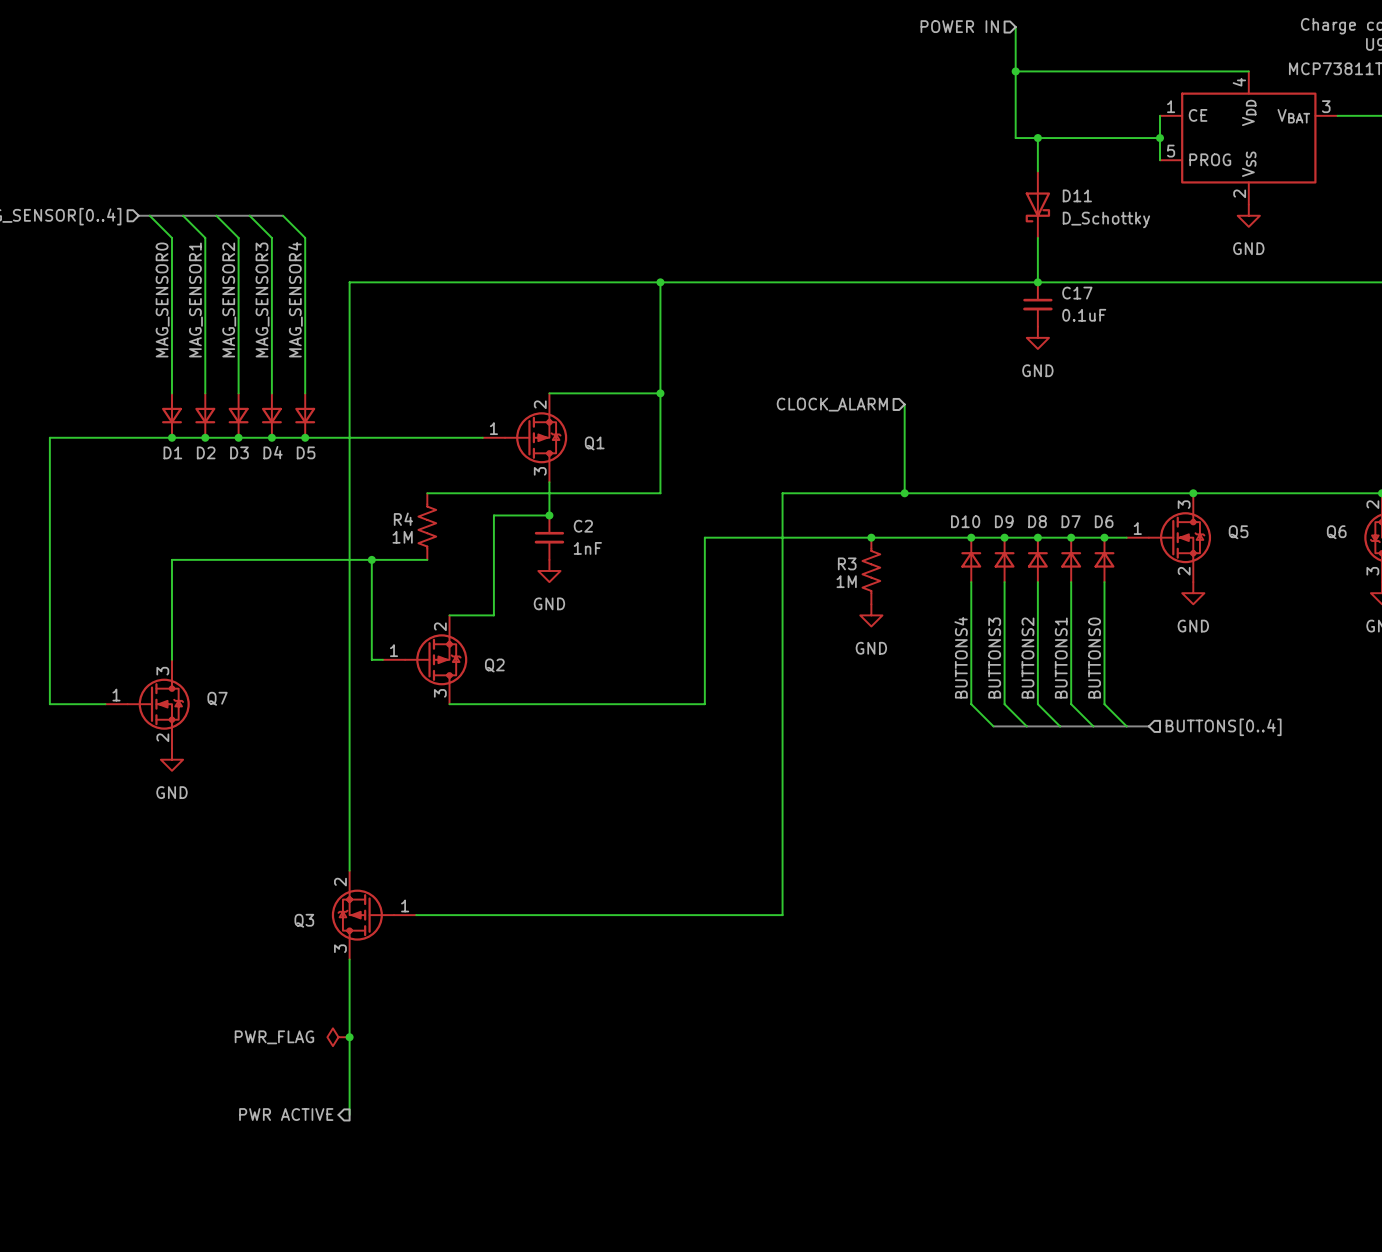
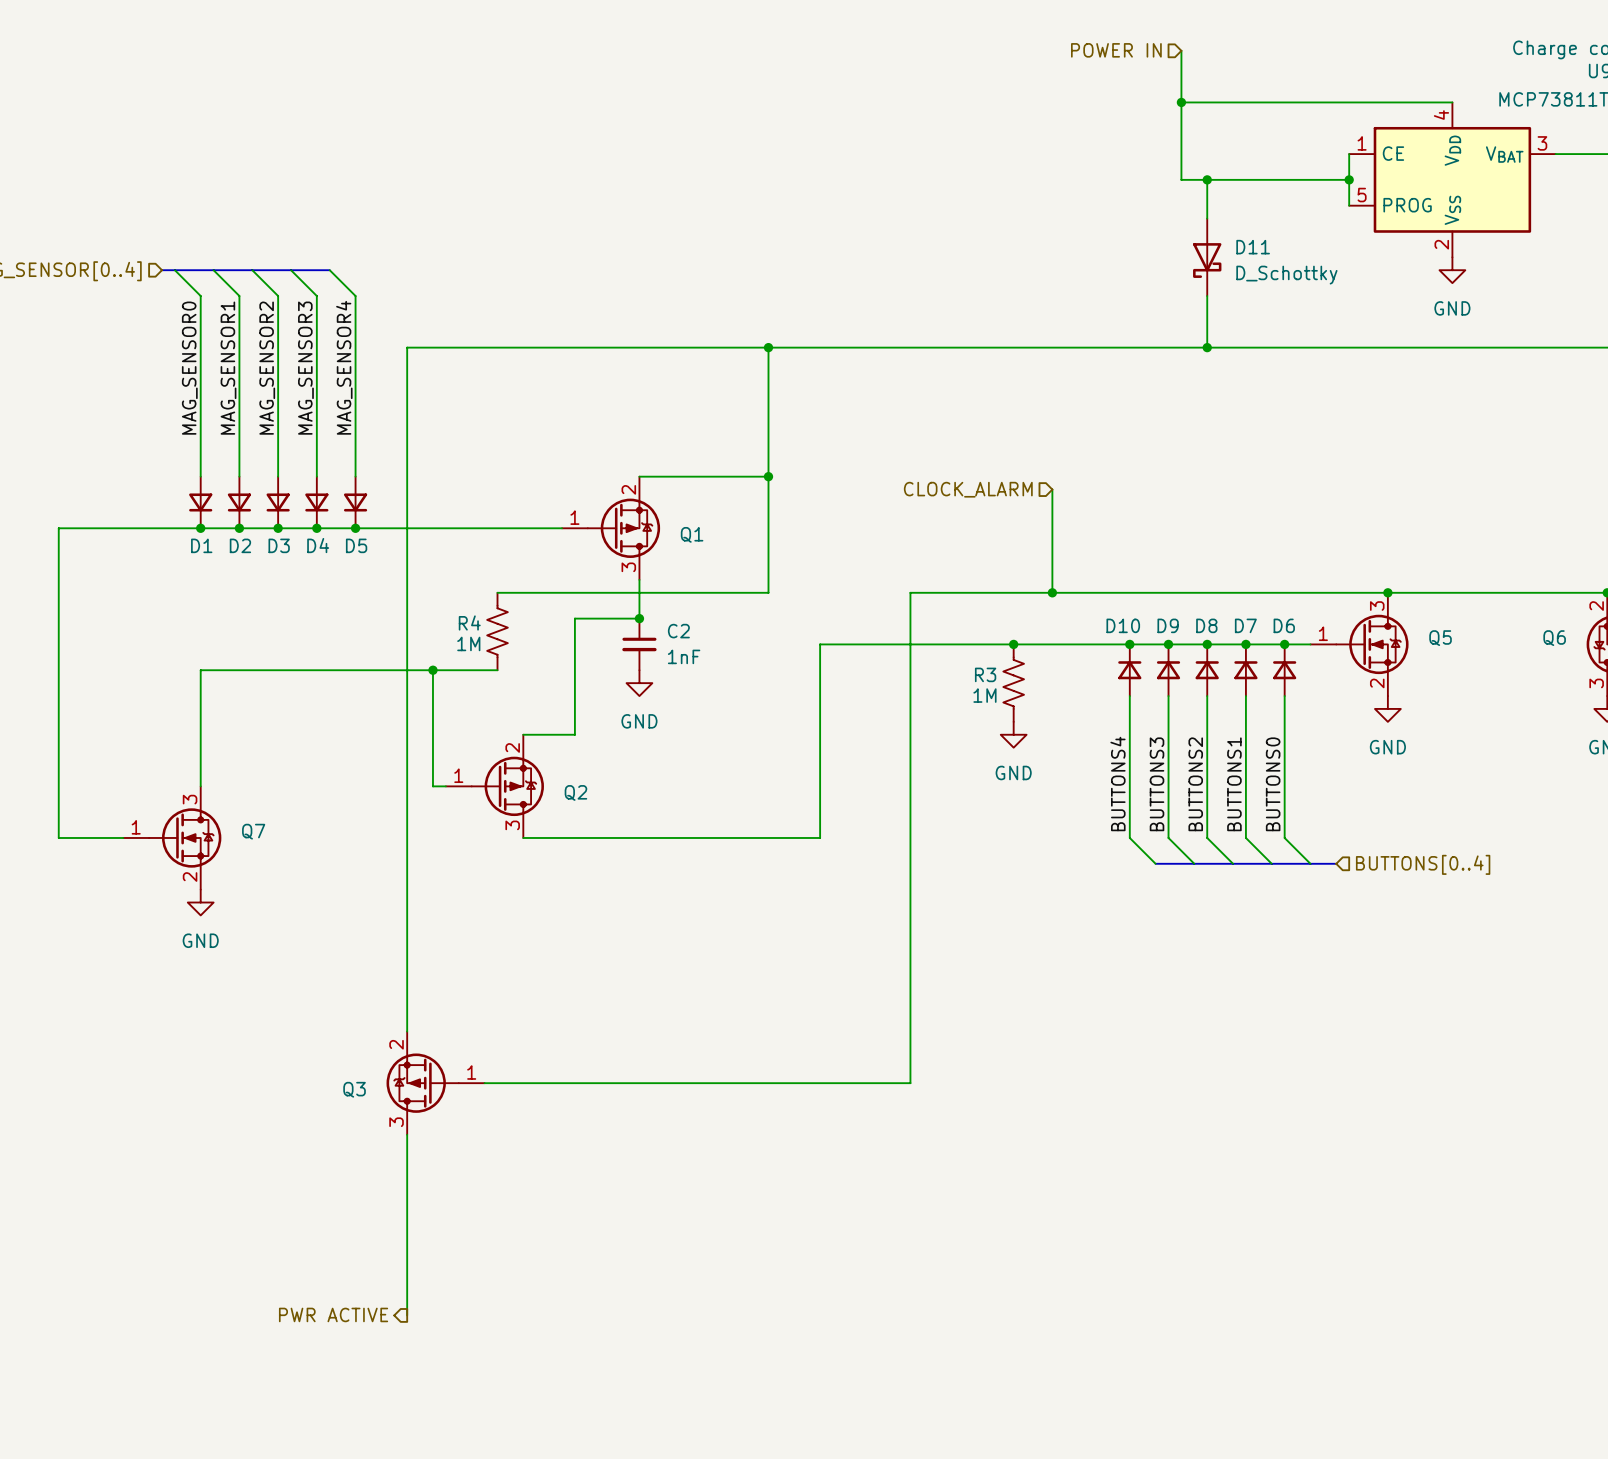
C17: 0.1uF (1037, 304) -> none
power symbol: GND (1037, 337) -> none
power symbol: PWR_FLAG (338, 1037) -> none
junction: (349, 1037) -> none

